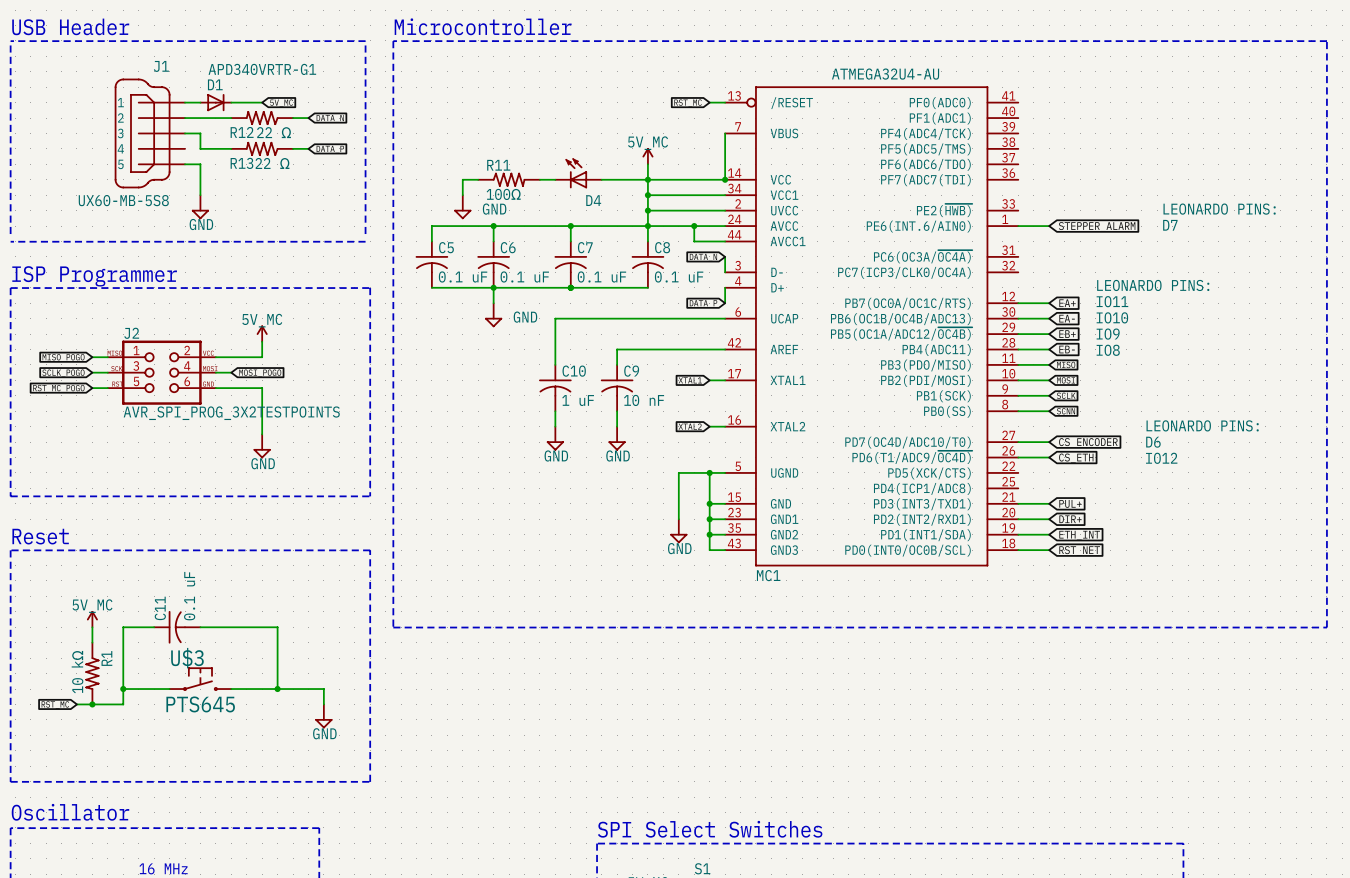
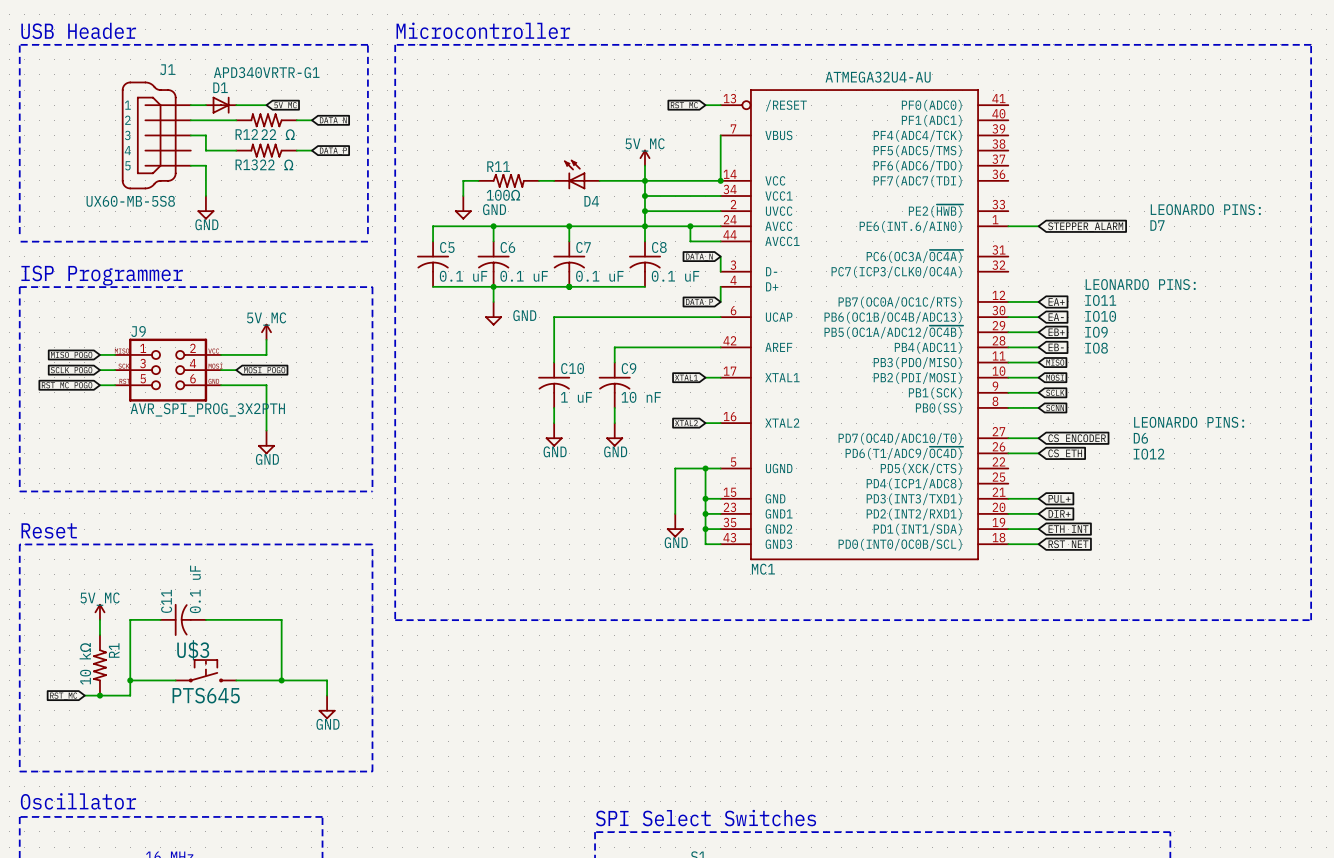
J2 name: J2 (131, 333) -> J9 (138, 331)
J2 value: AVR_SPI_PROG_3X2TESTPOINTS (231, 413) -> AVR_SPI_PROG_3X2PTH (207, 409)

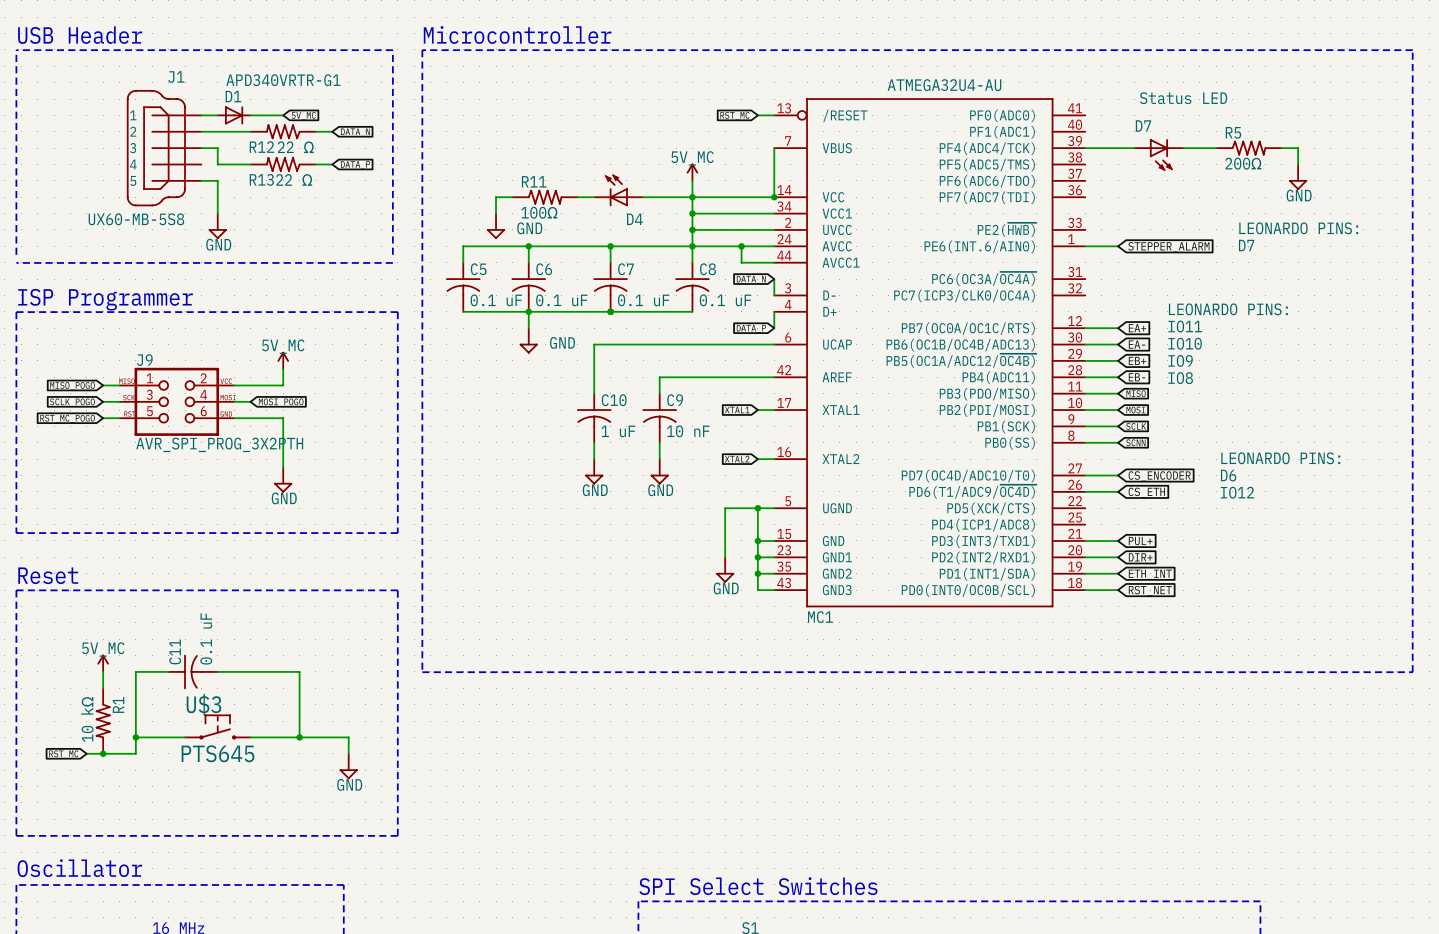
text: none -> Status LED (1183, 98)
wire: none -> (1085, 148) (1134, 148)
wire: none -> (1183, 148) (1216, 148)
R5: none -> 200Ω (1248, 148)
wire: none -> (1281, 148) (1298, 148) (1298, 164)
D7: none -> (1158, 154)
power symbol: none -> GND (1298, 177)

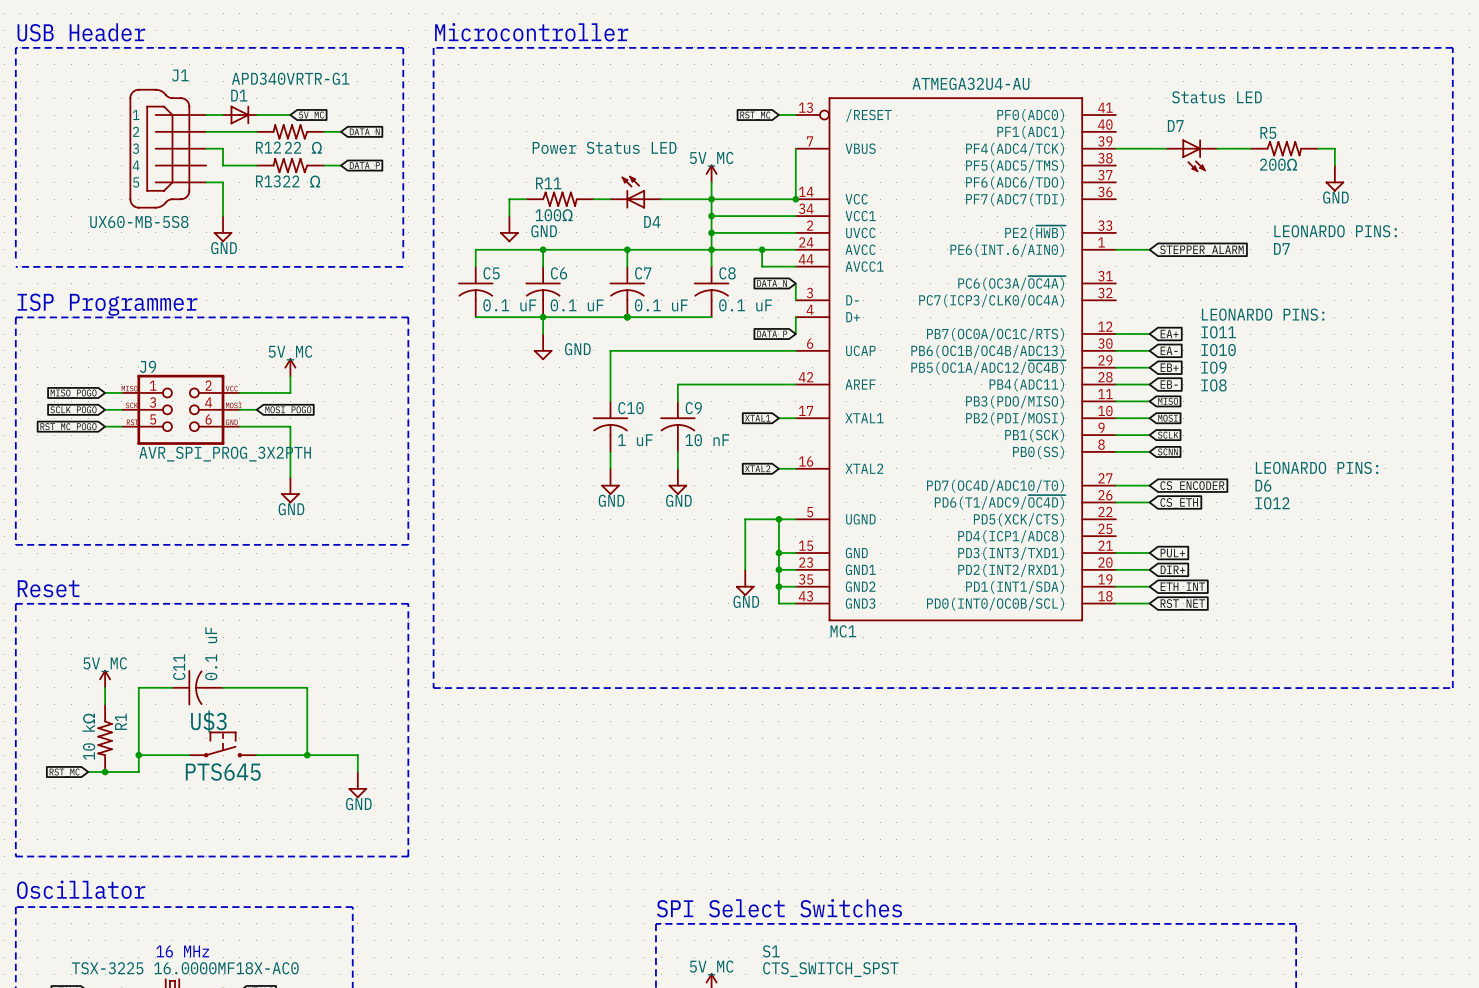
text: none -> Power Status LED (604, 147)

